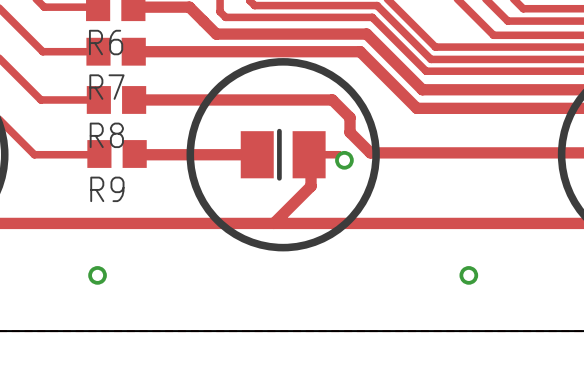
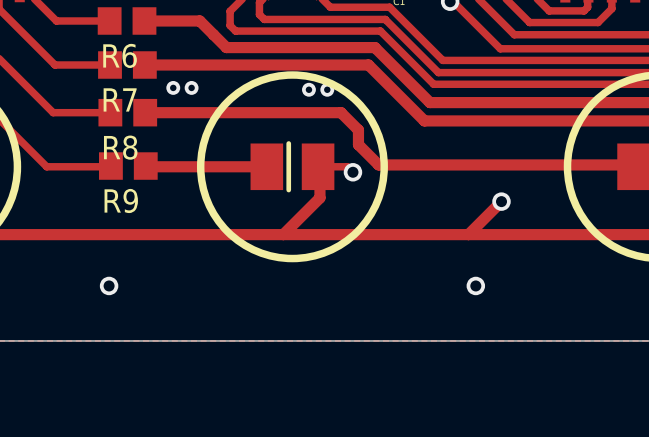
via: none -> (173, 87)
via: none -> (191, 87)
via: none -> (308, 89)
via: none -> (327, 89)
track: none -> (501, 201) (468, 234)
via: none -> (501, 201)

